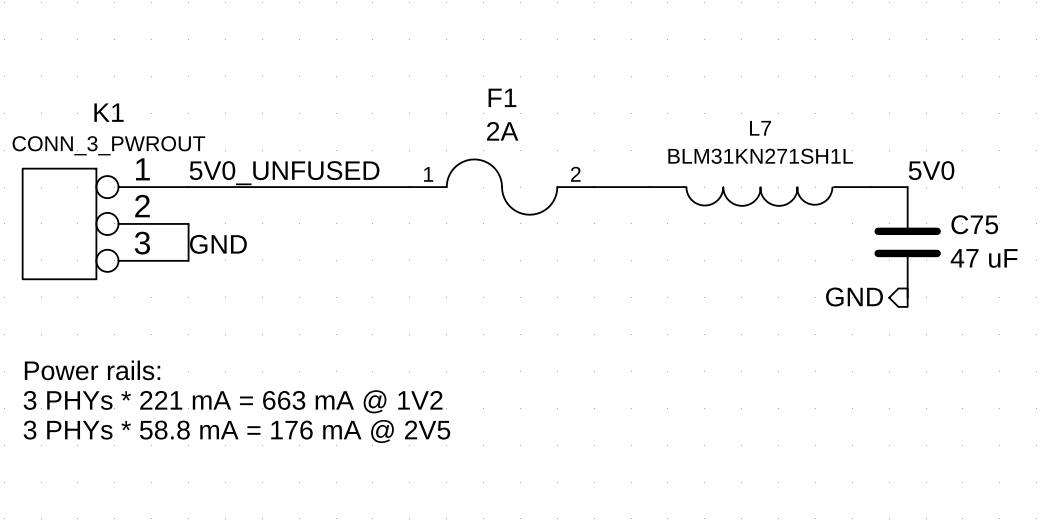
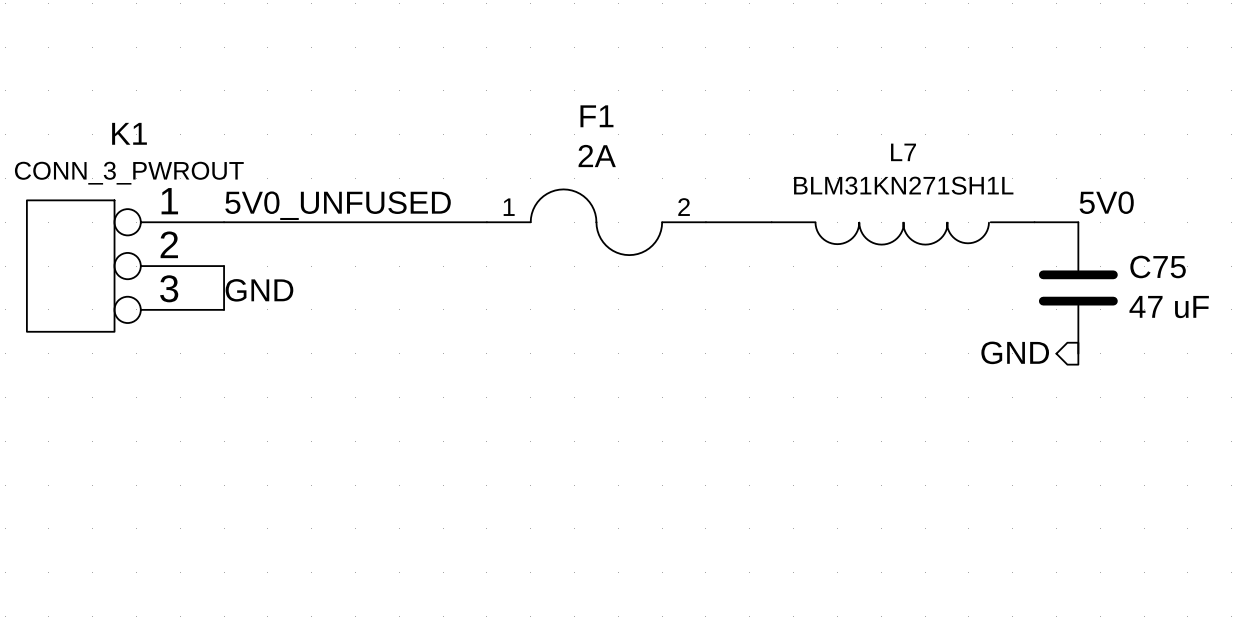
text: Power rails: (92, 370) -> none
text: 3 PHYs * 221 mA = 663 mA @ 1V2 (233, 401) -> none
text: 3 PHYs * 58.8 mA = 176 mA @ 2V5 (236, 431) -> none

